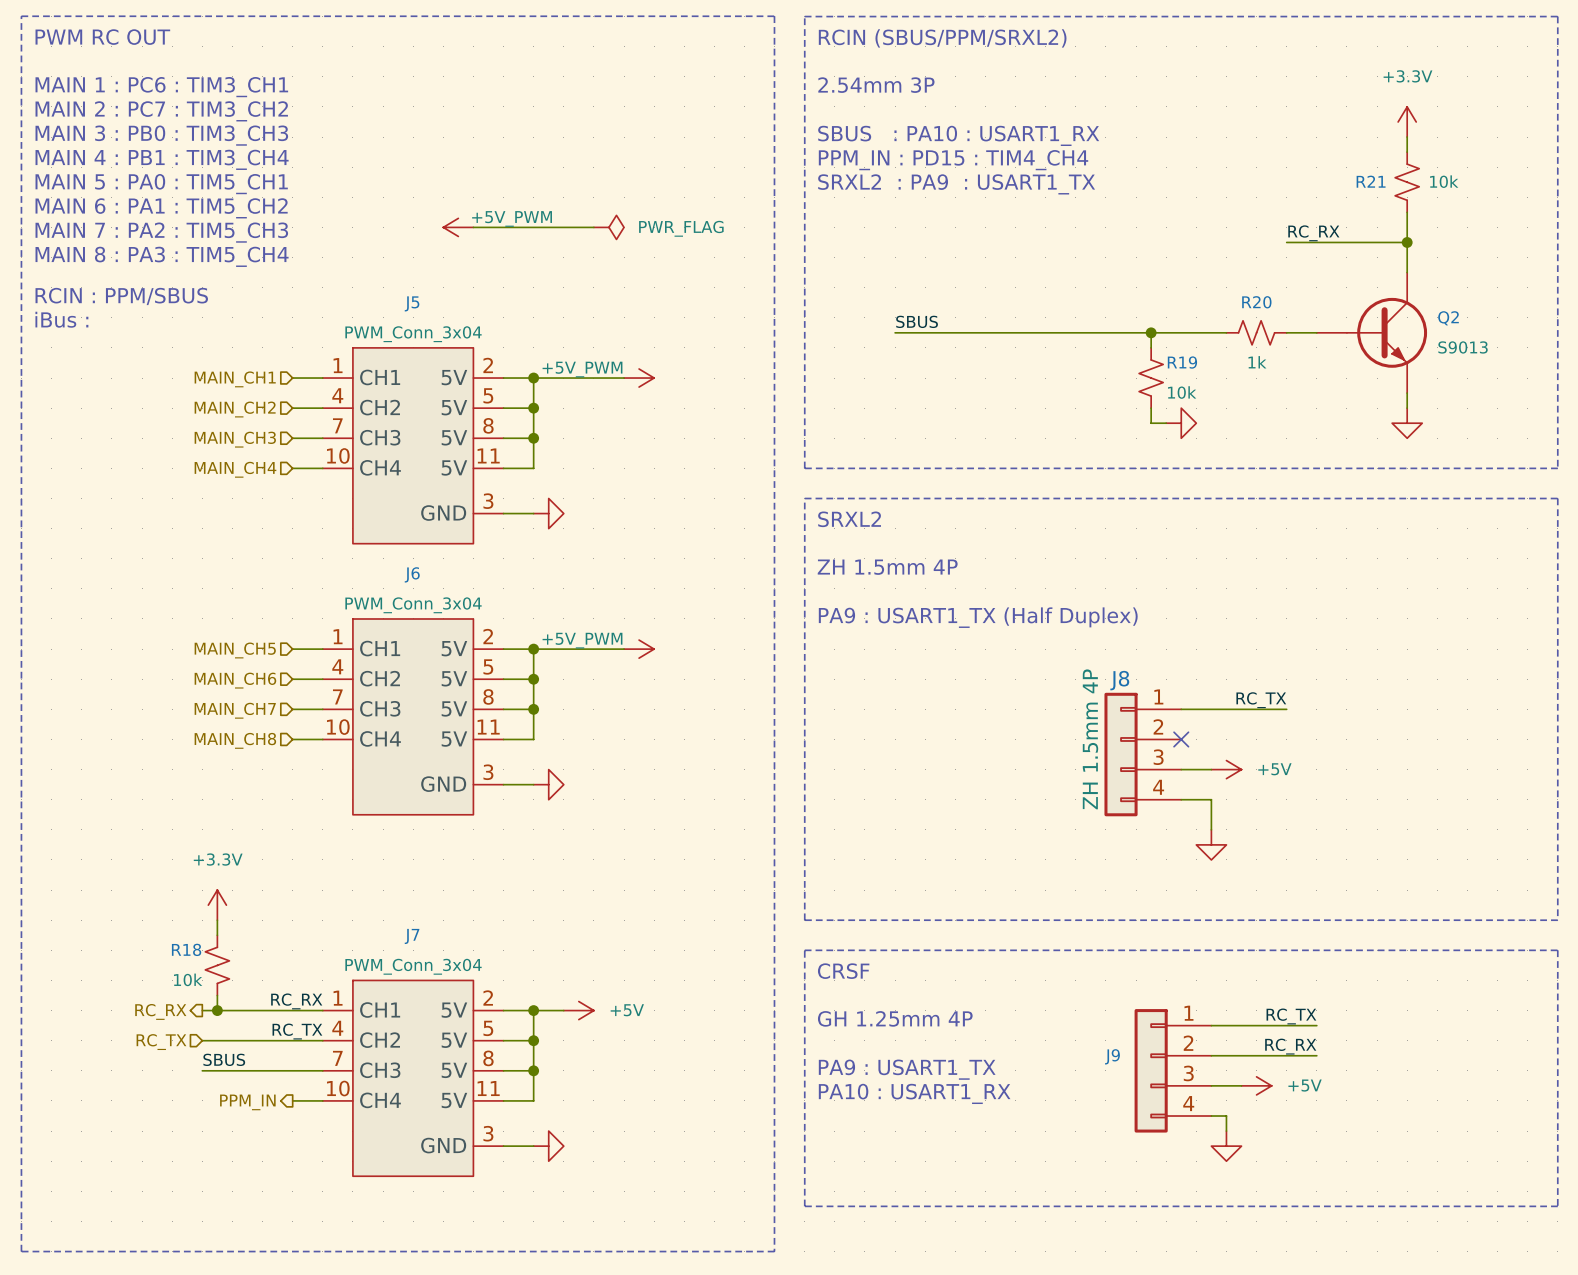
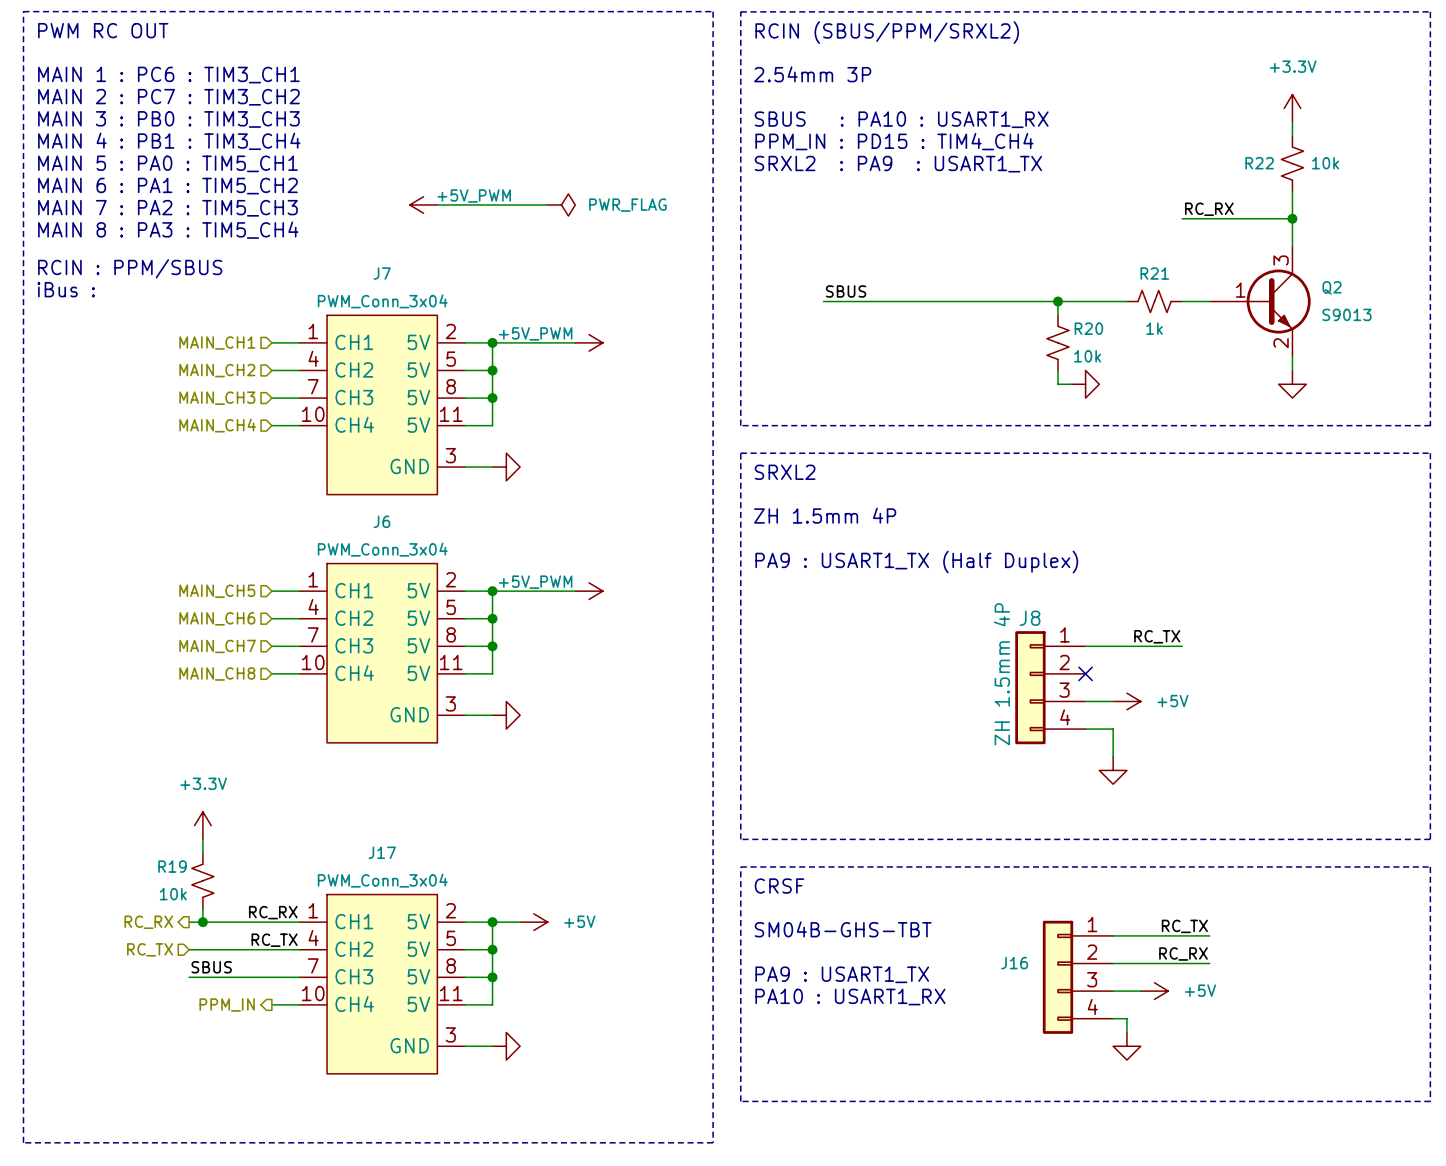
R21 name: R21 (1371, 181) -> R22 (1259, 163)
Q2 symbol: [1316, 272, 1428, 394] -> [1209, 246, 1311, 357]
R20 name: R20 (1256, 302) -> R21 (1154, 273)
J5 name: J5 (412, 303) -> J7 (382, 273)
R19 name: R19 (1182, 362) -> R20 (1088, 328)
J7 name: J7 (412, 936) -> J17 (382, 852)
R18 name: R18 (186, 949) -> R19 (172, 866)
text: GH 1.25mm 4P (895, 1018) -> SM04B-GHS-TBT (843, 929)
J9 name: J9 (1112, 1056) -> J16 (1014, 963)

